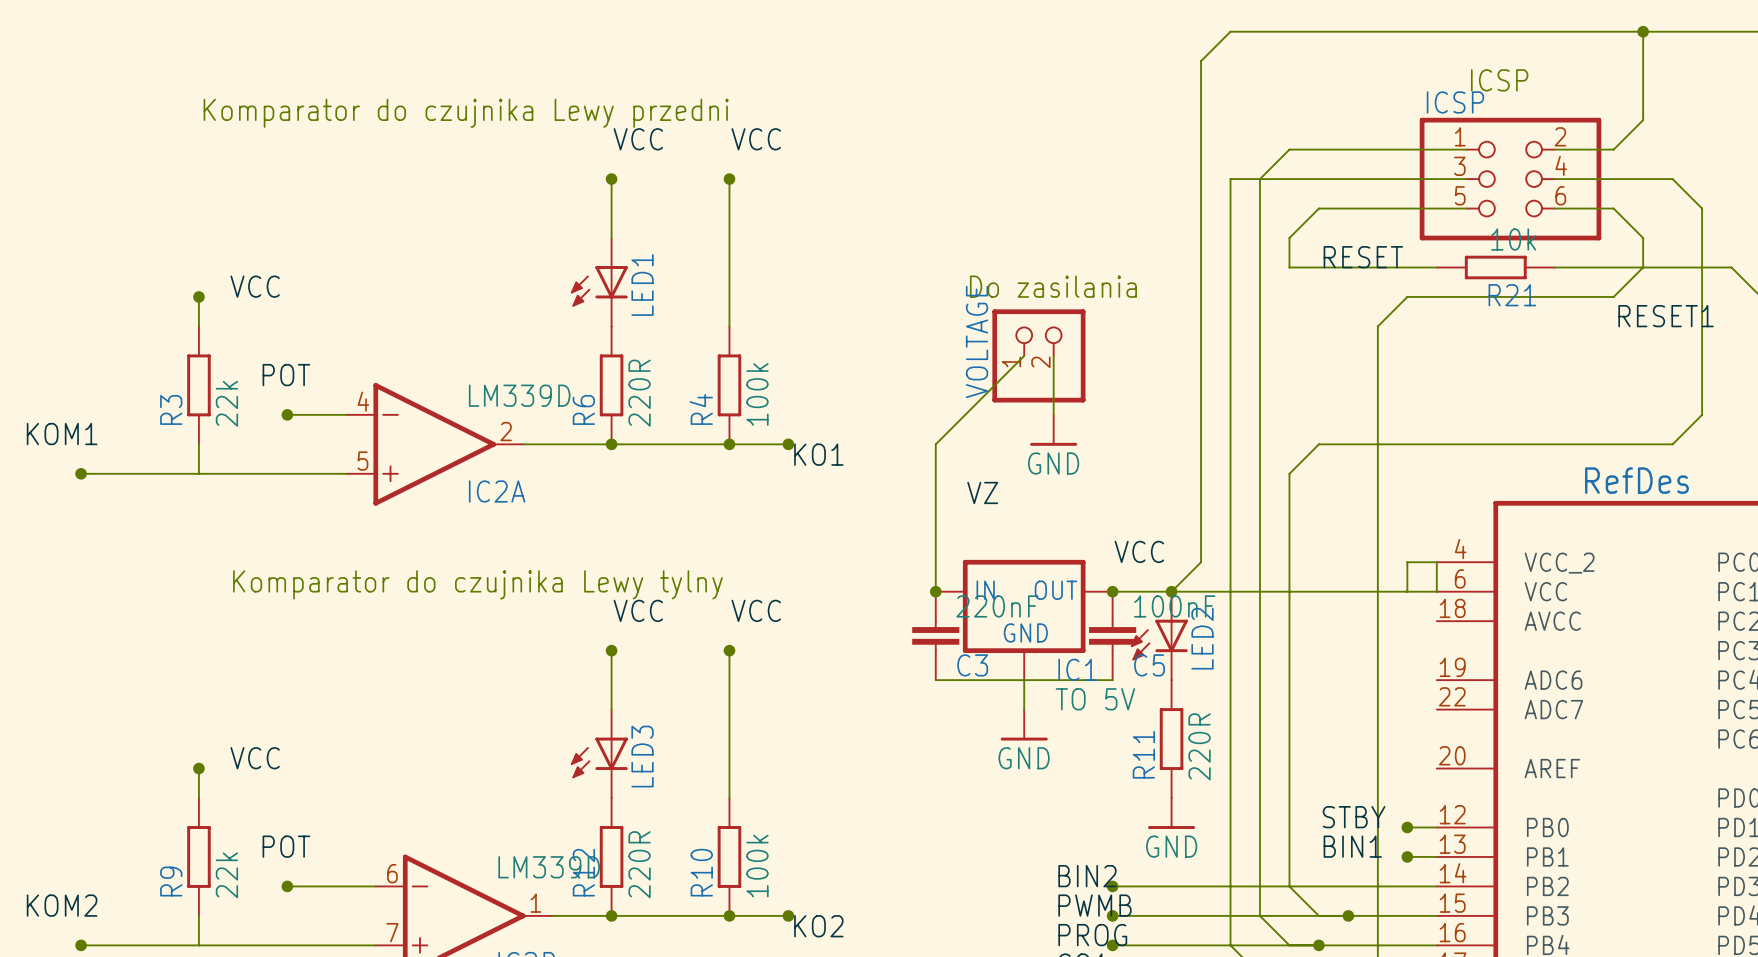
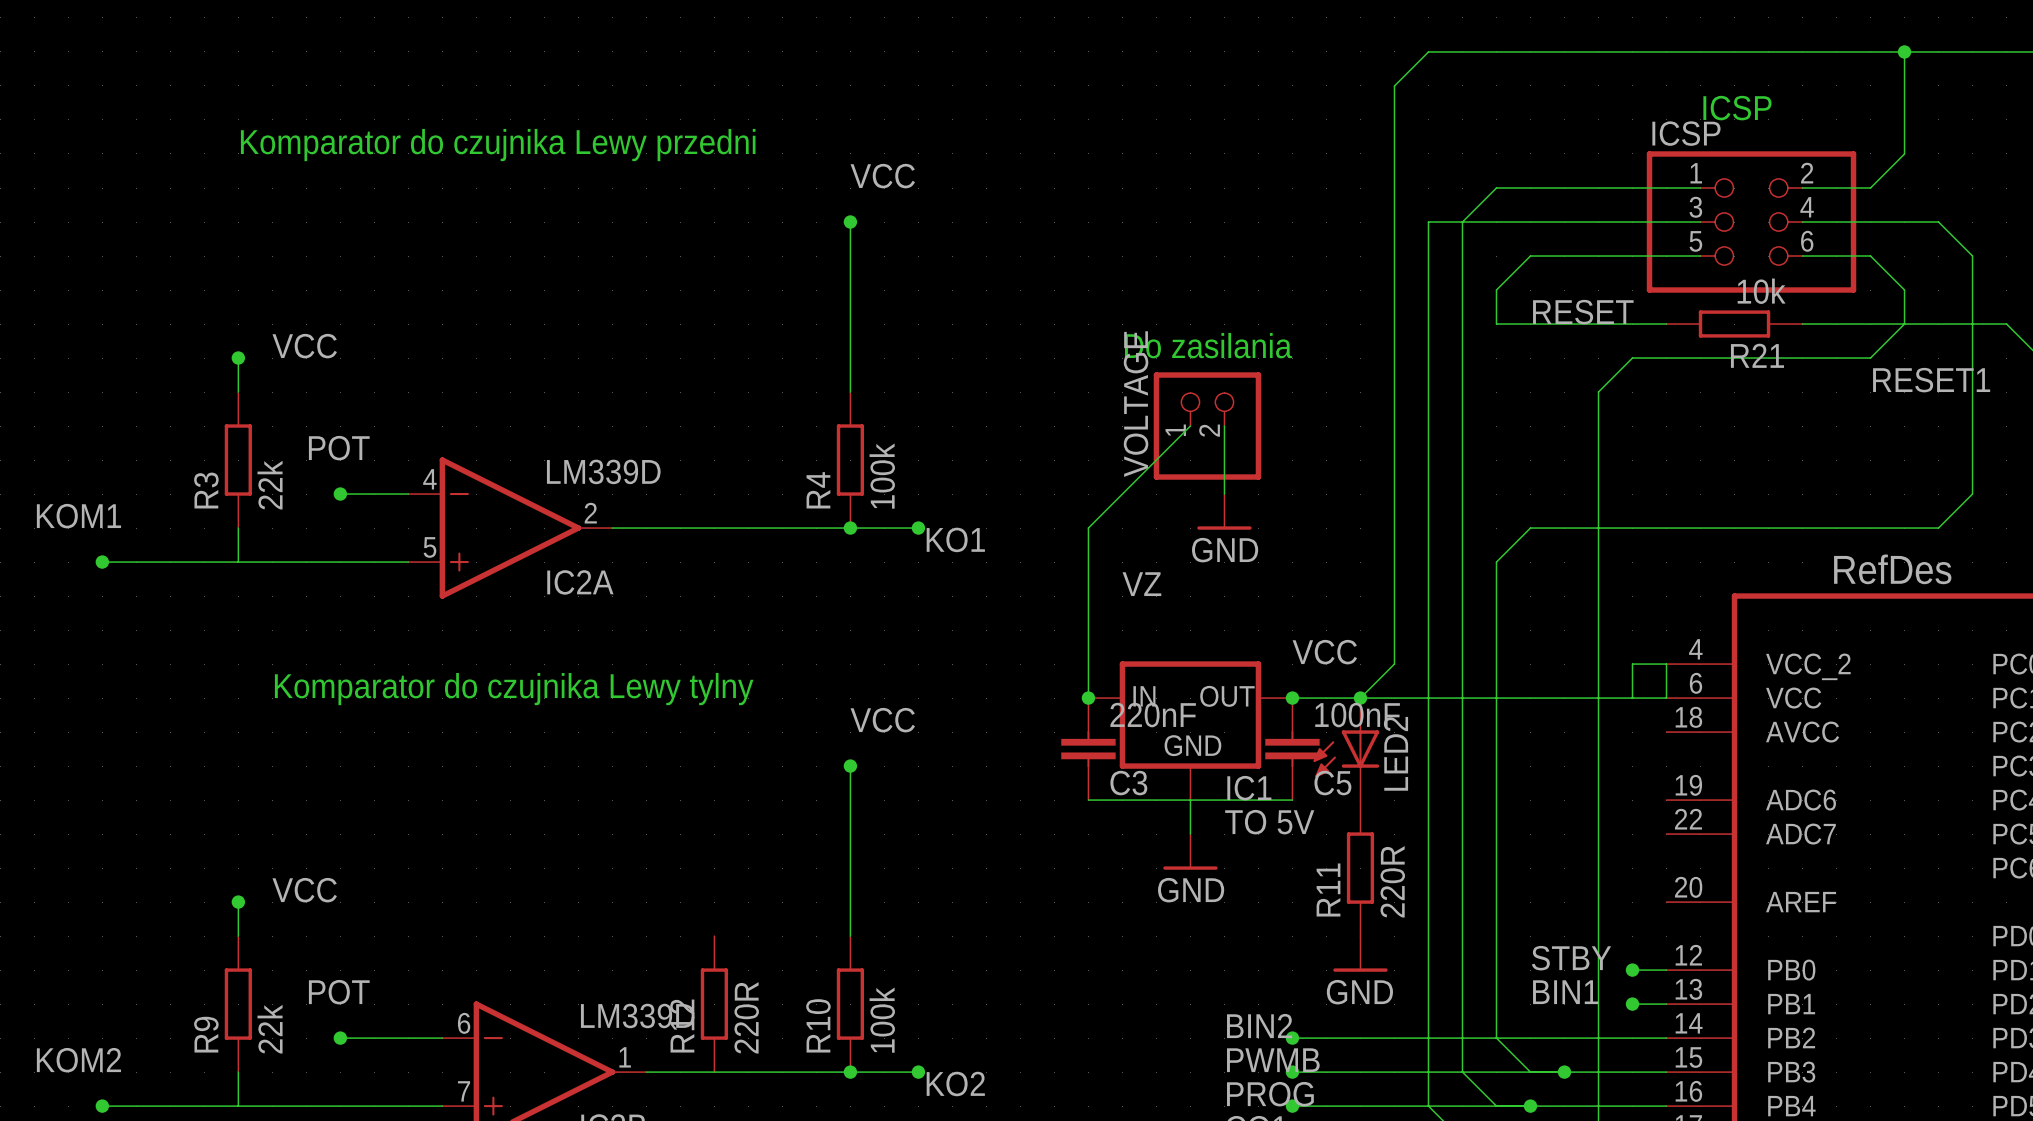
label: VCC (638, 139) -> none
wire: (611, 179) (611, 238) -> none
junction: (611, 179) -> none
LED1: (599, 282) -> none
R6: 220R (611, 385) -> none
junction: (611, 444) -> none
label: VCC (638, 610) -> none
wire: (611, 650) (611, 709) -> none
junction: (611, 650) -> none
LED3: (599, 753) -> none
junction: (611, 915) -> none

